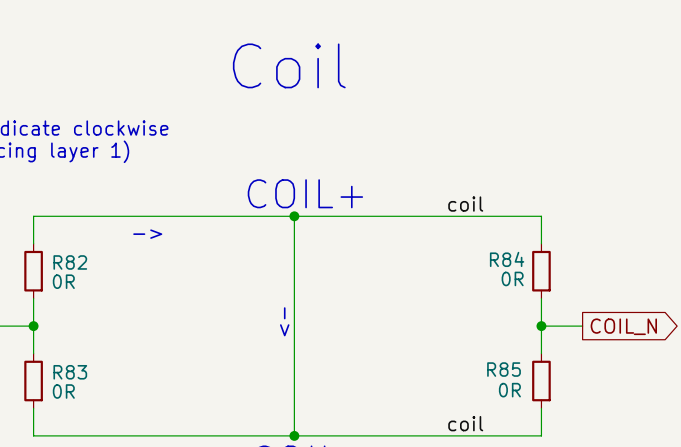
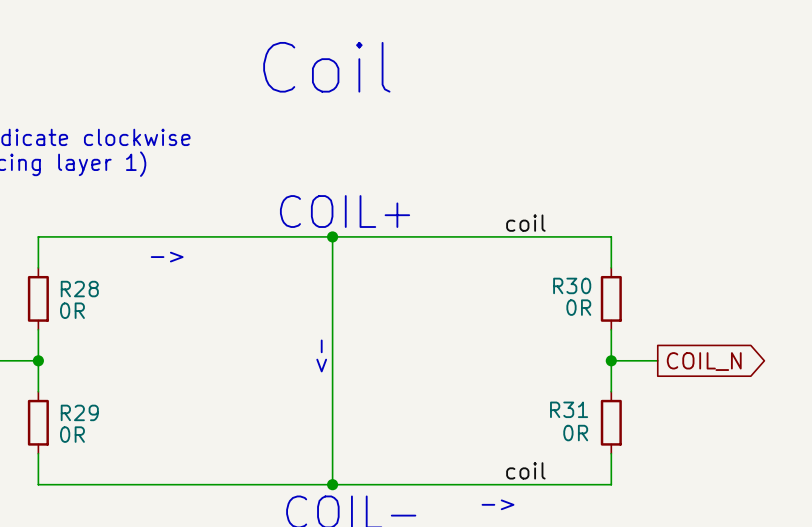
R84 name: R84 (507, 259) -> R30 (572, 285)
R82 name: R82 (70, 262) -> R28 (79, 289)
R85 name: R85 (504, 369) -> R31 (569, 409)
R83 name: R83 (70, 372) -> R29 (79, 412)

